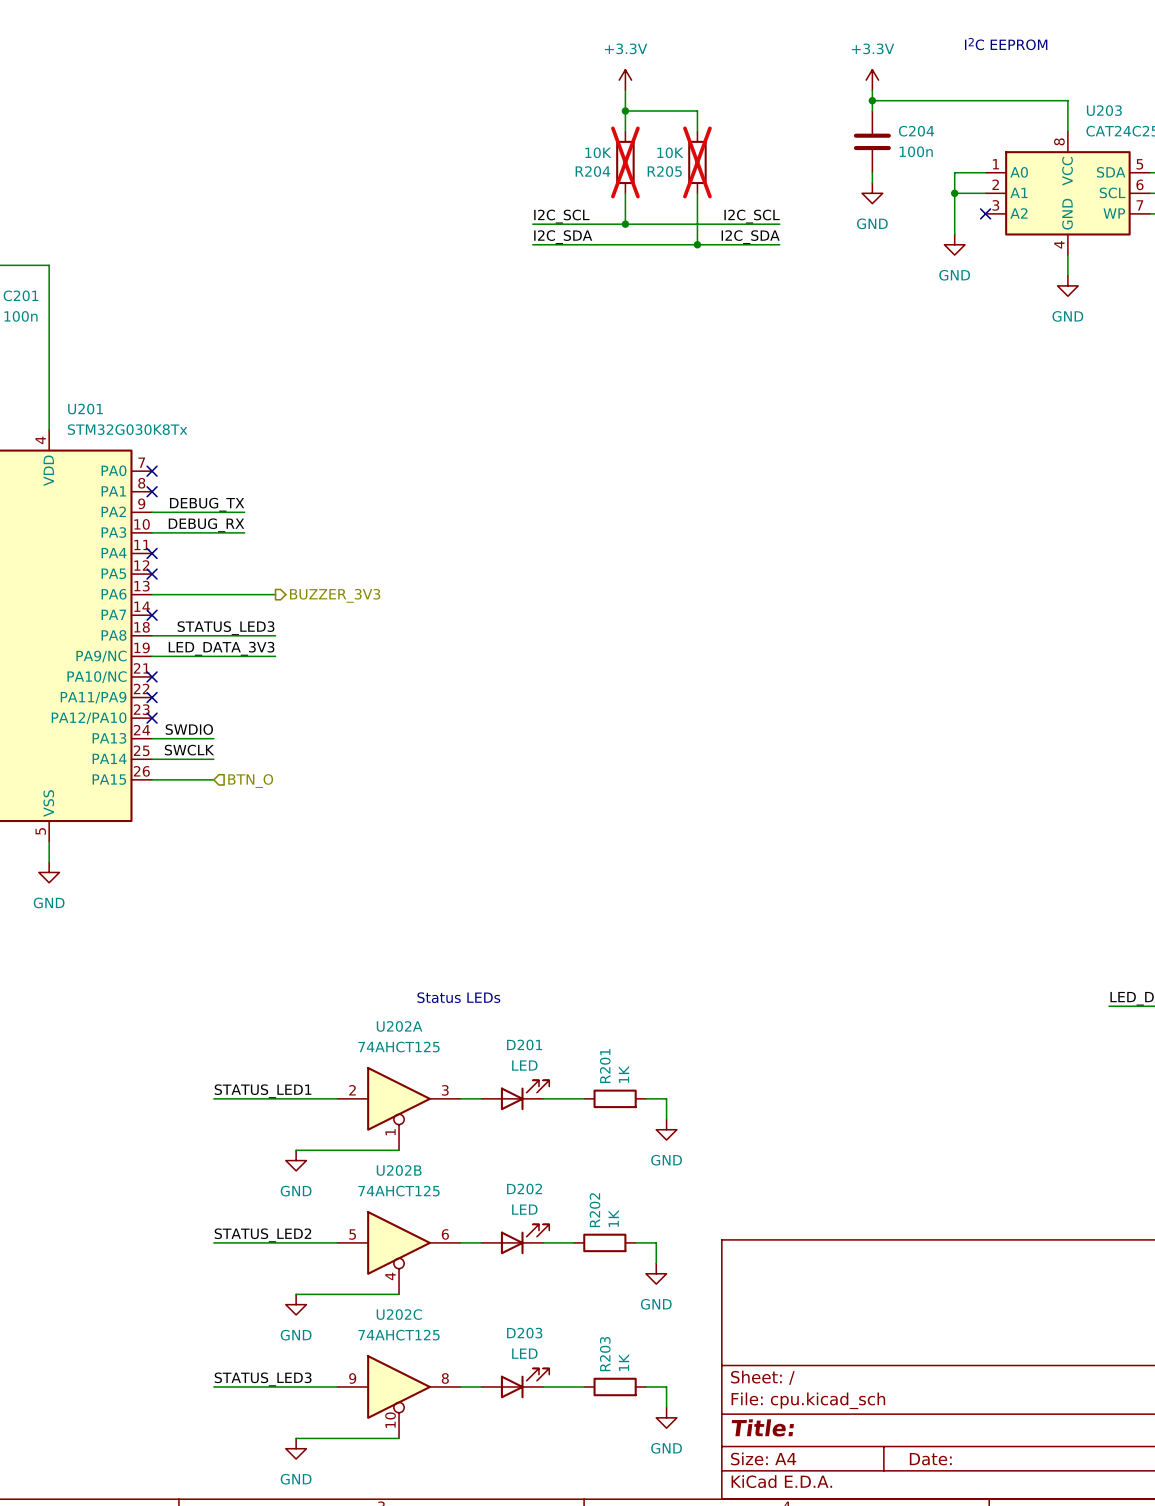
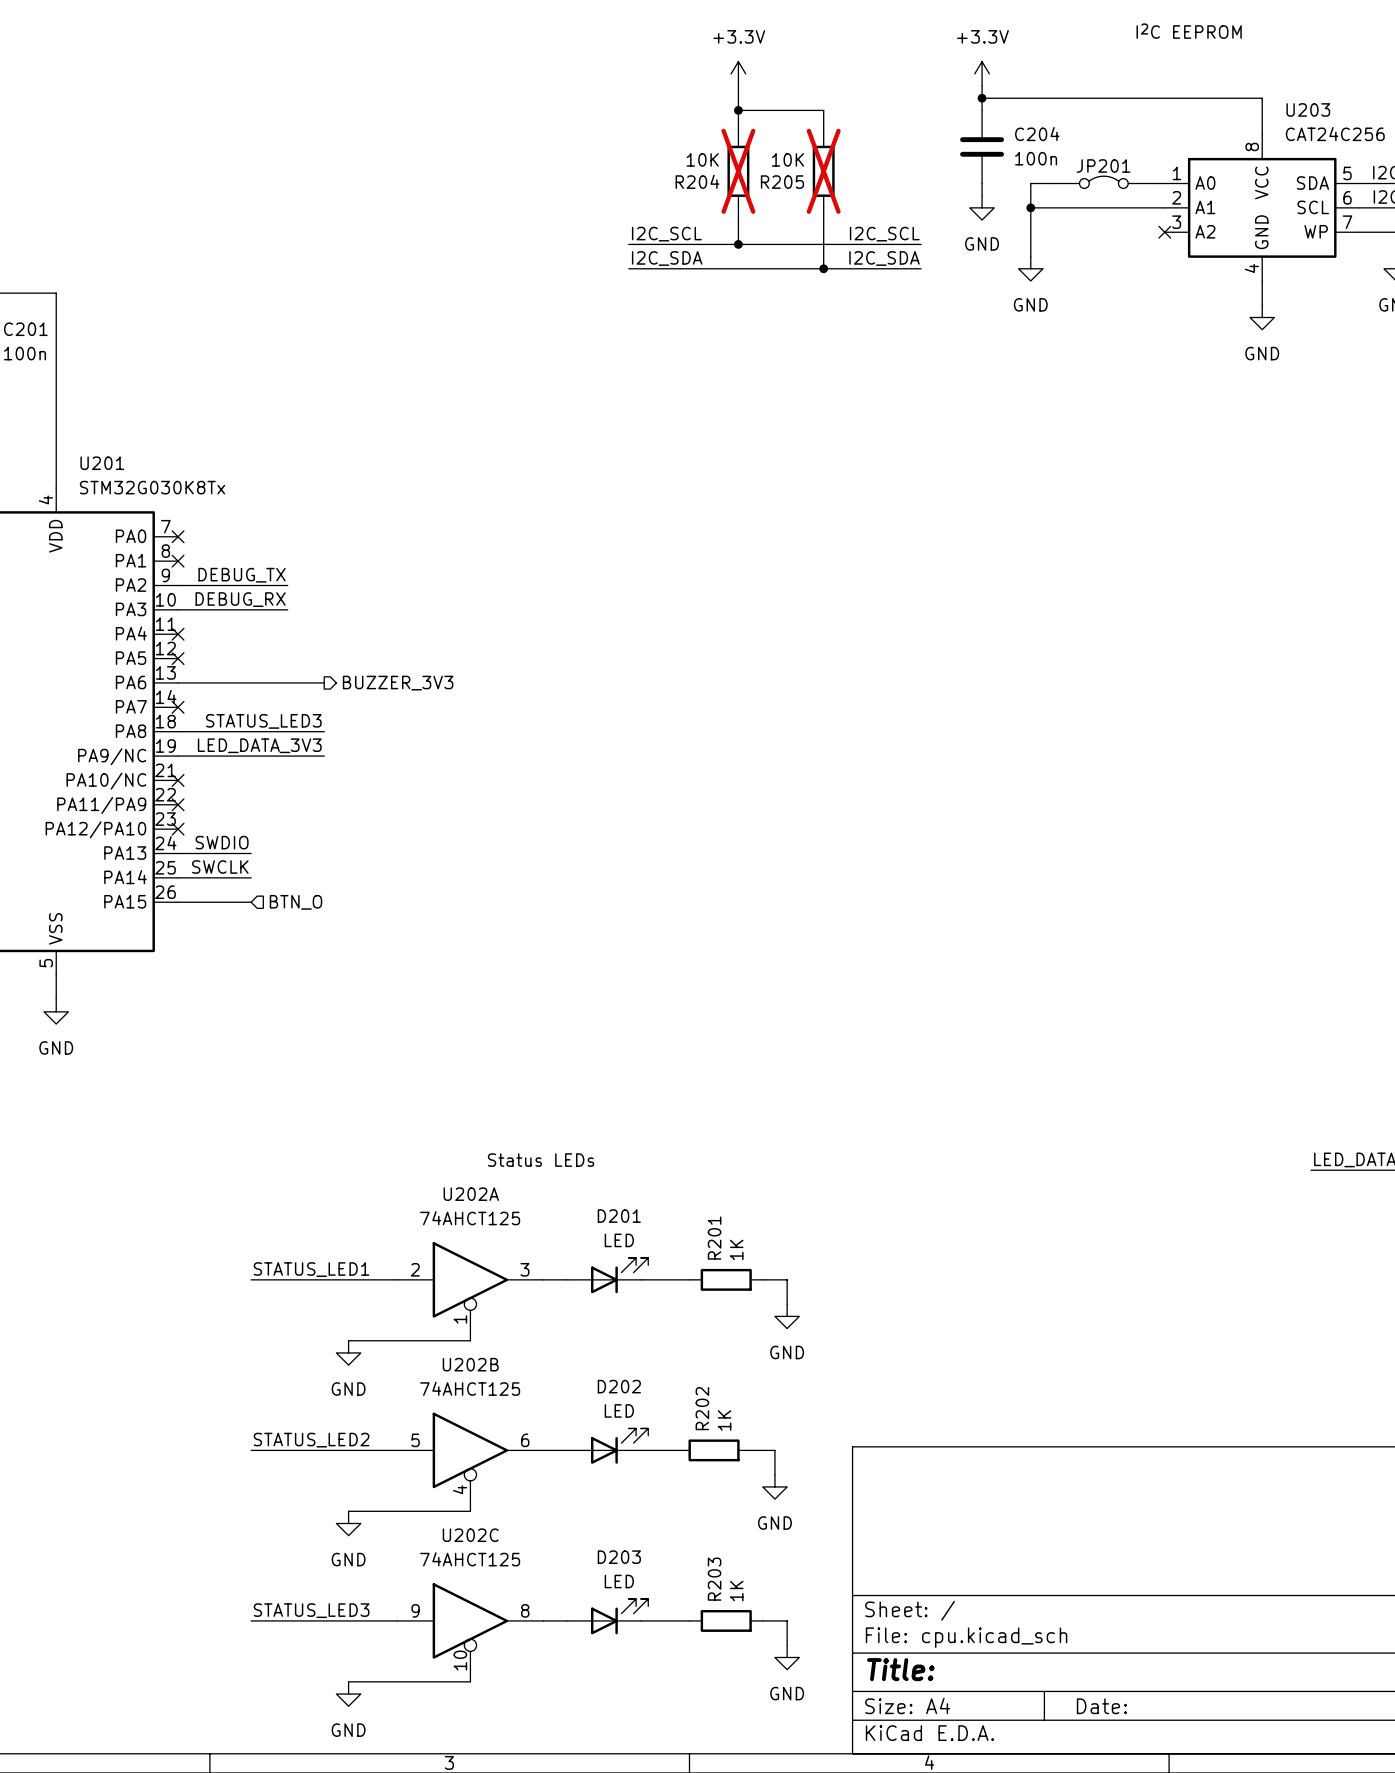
power symbol position: +3.3V (872, 80) -> +3.3V (982, 73)
wire: (872, 90) (872, 110) -> (982, 86) (982, 110)
wire: none -> (982, 98) (1030, 98)
junction position: (872, 100) -> (982, 98)
C204 position: (872, 141) -> (982, 146)
JP201: none -> (1103, 182)
wire: none -> (982, 183) (982, 195)
wire: none -> (1030, 183) (1055, 183)
wire: (975, 172) (954, 172) (954, 234) -> none
wire: none -> (1030, 195) (1030, 256)
power symbol: none -> GND (982, 207)
wire: none -> (1030, 207) (1128, 207)
junction: none -> (1030, 207)
power symbol: GND (872, 193) -> none
junction: (954, 193) -> none
power symbol: none -> GND (1030, 268)
power symbol: GND (954, 244) -> none

